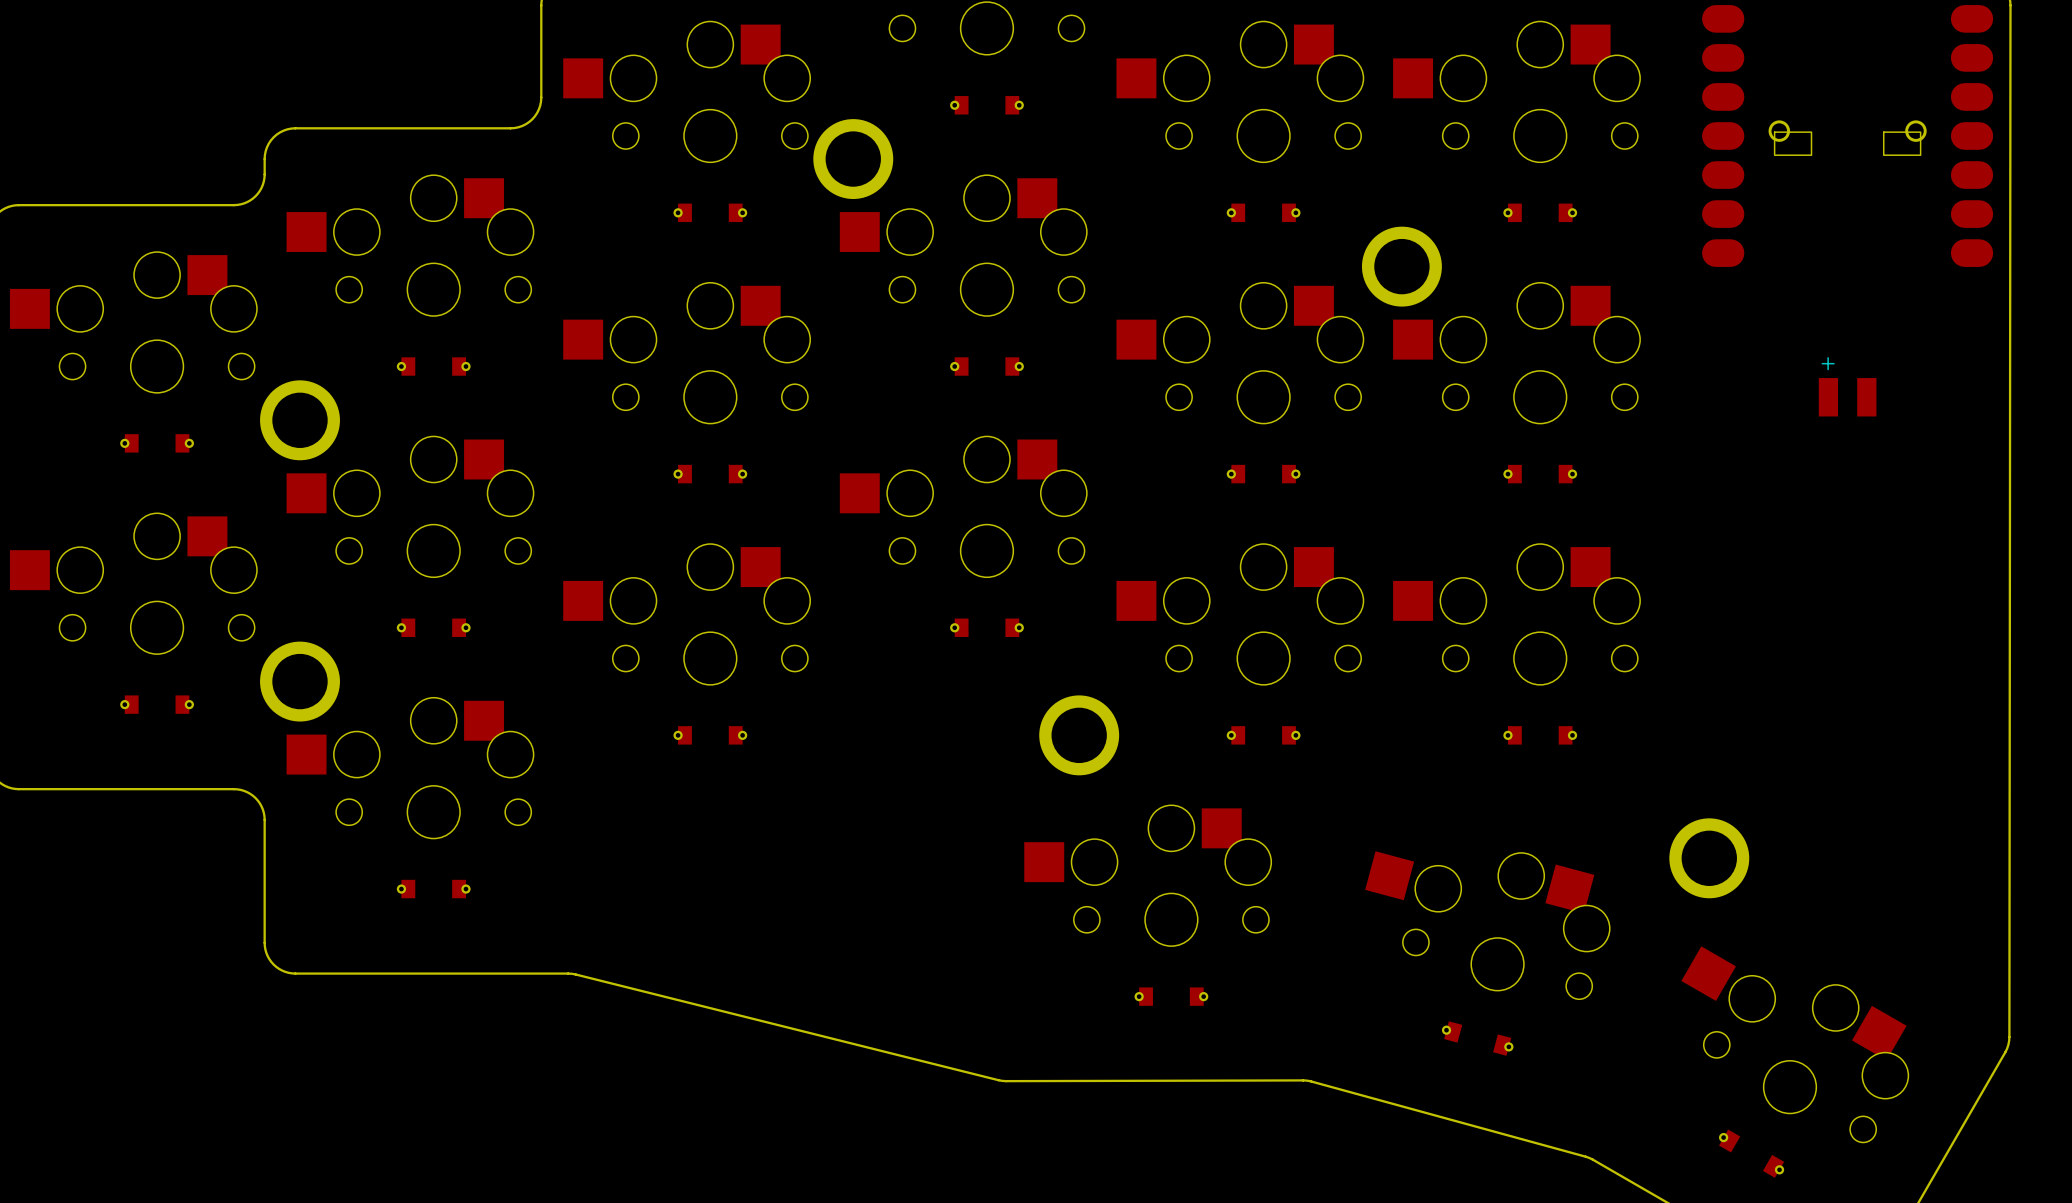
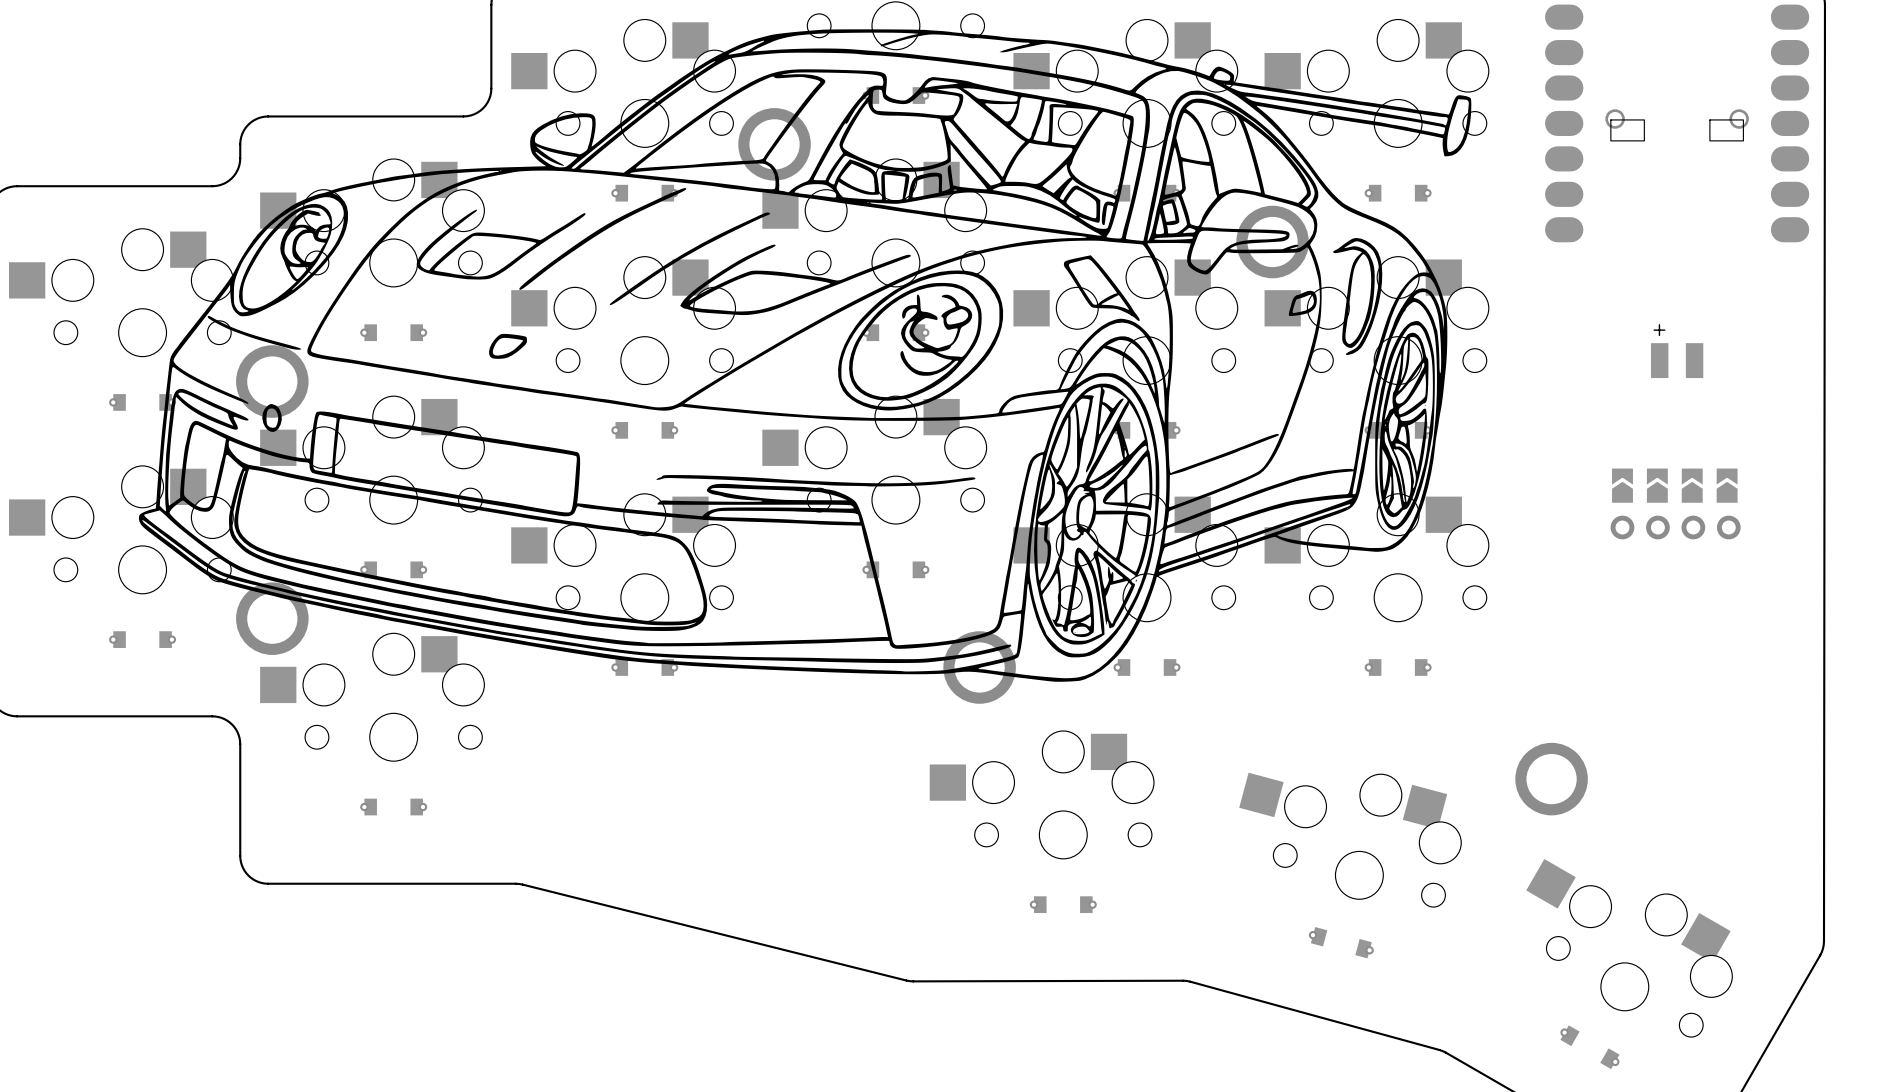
drawing: none -> [138, 29, 1472, 682]
part: none -> (1622, 485)
part: none -> (1657, 485)
part: none -> (1692, 485)
part: none -> (1727, 485)
part: none -> (1675, 527)

